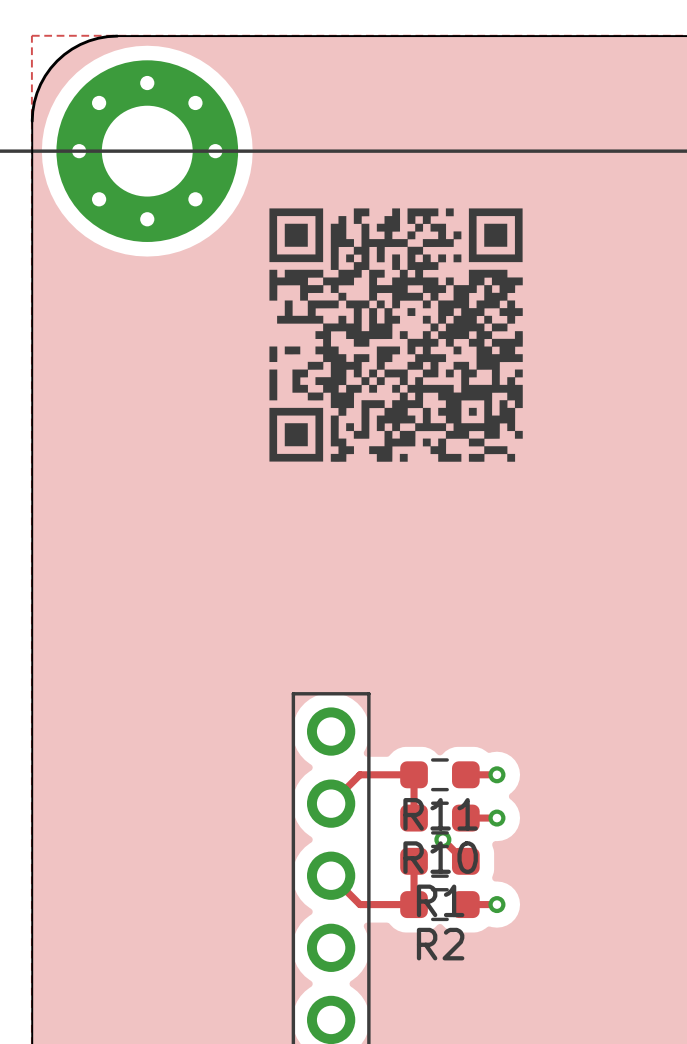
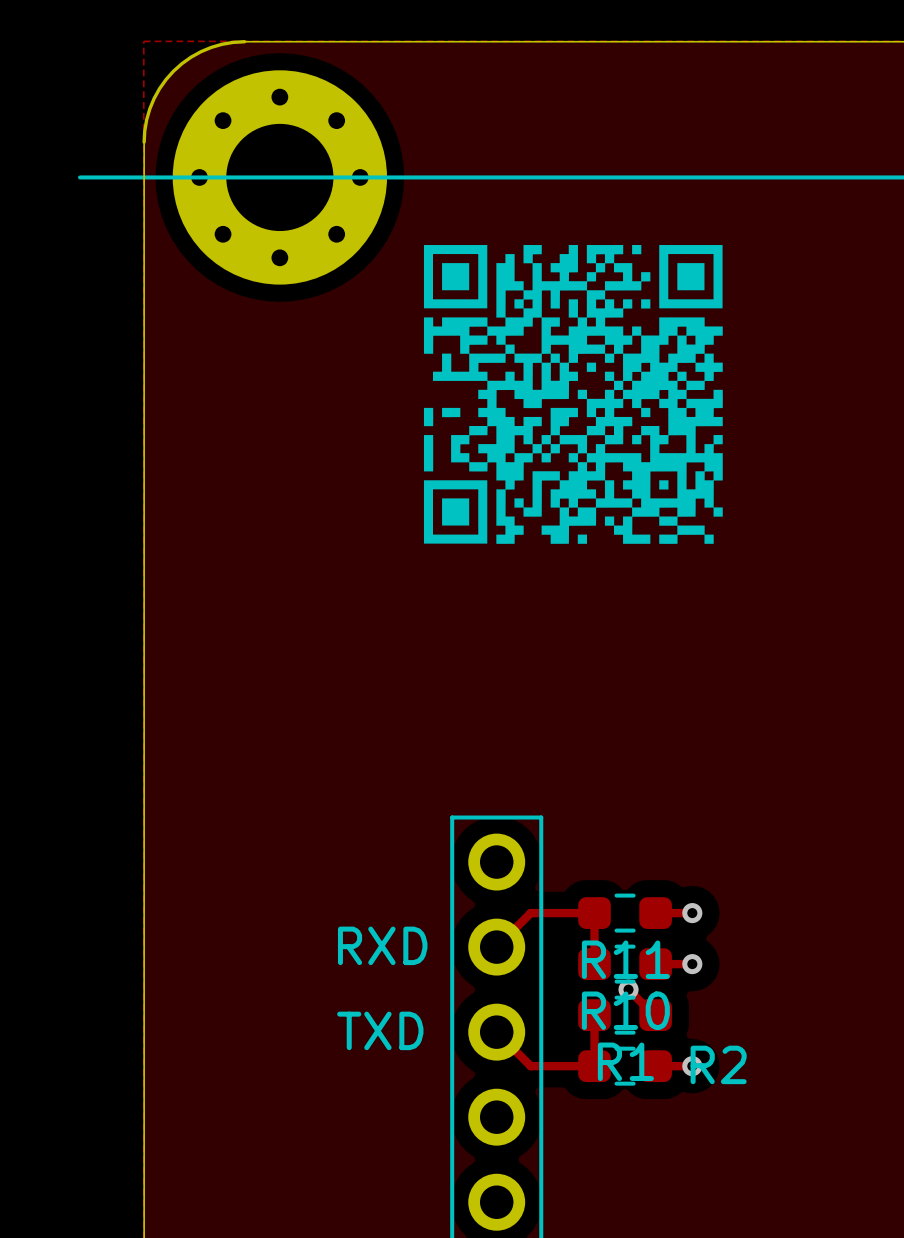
text: none -> RXD (382, 945)
text: none -> TXD (380, 1030)
R2 name position: R2 (440, 944) -> R2 (718, 1064)

